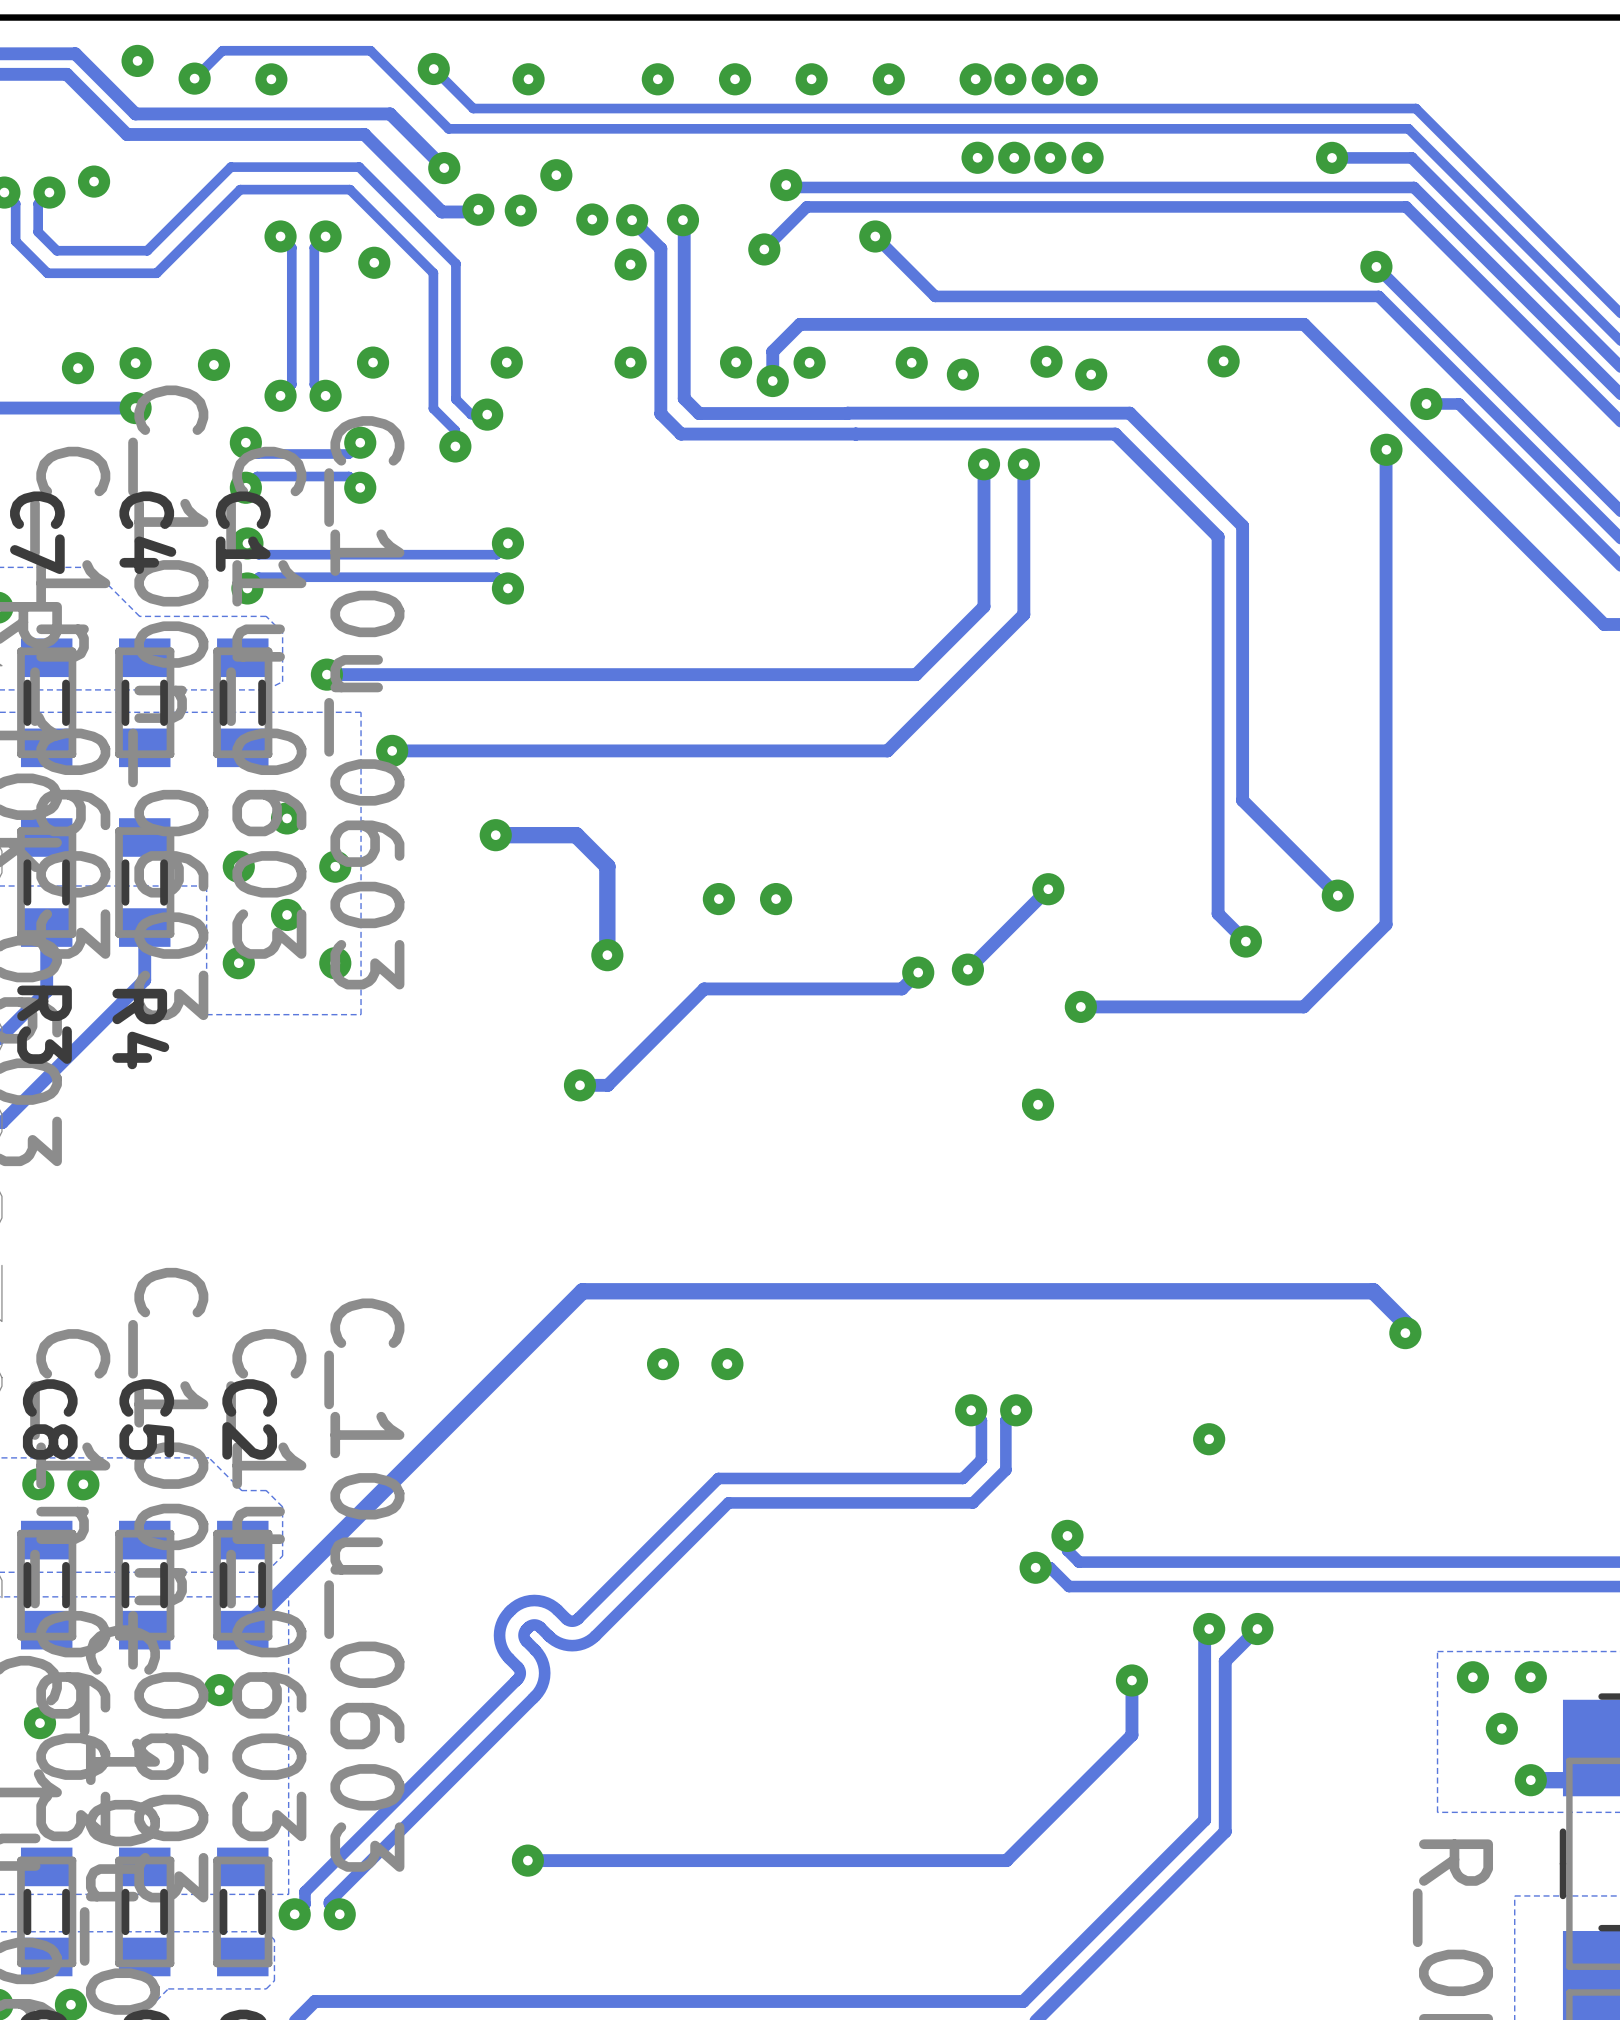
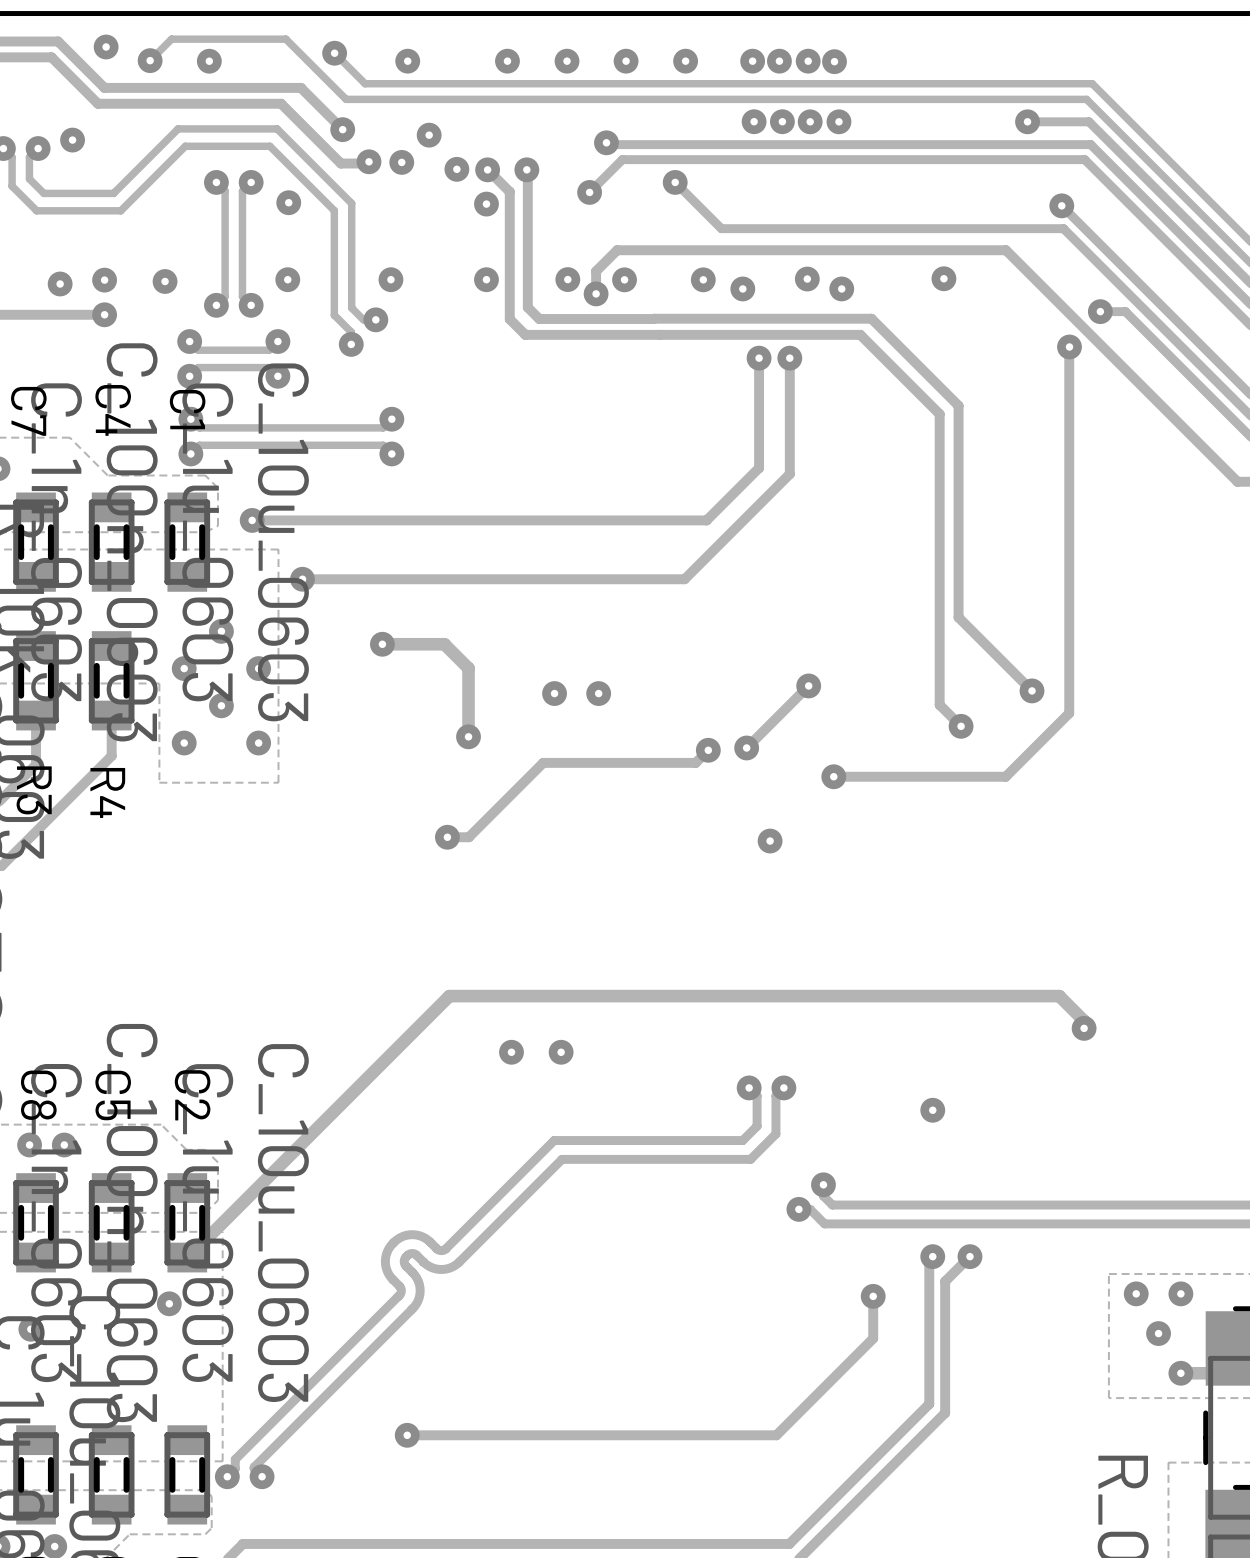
via position: (1038, 1104) -> (770, 841)

